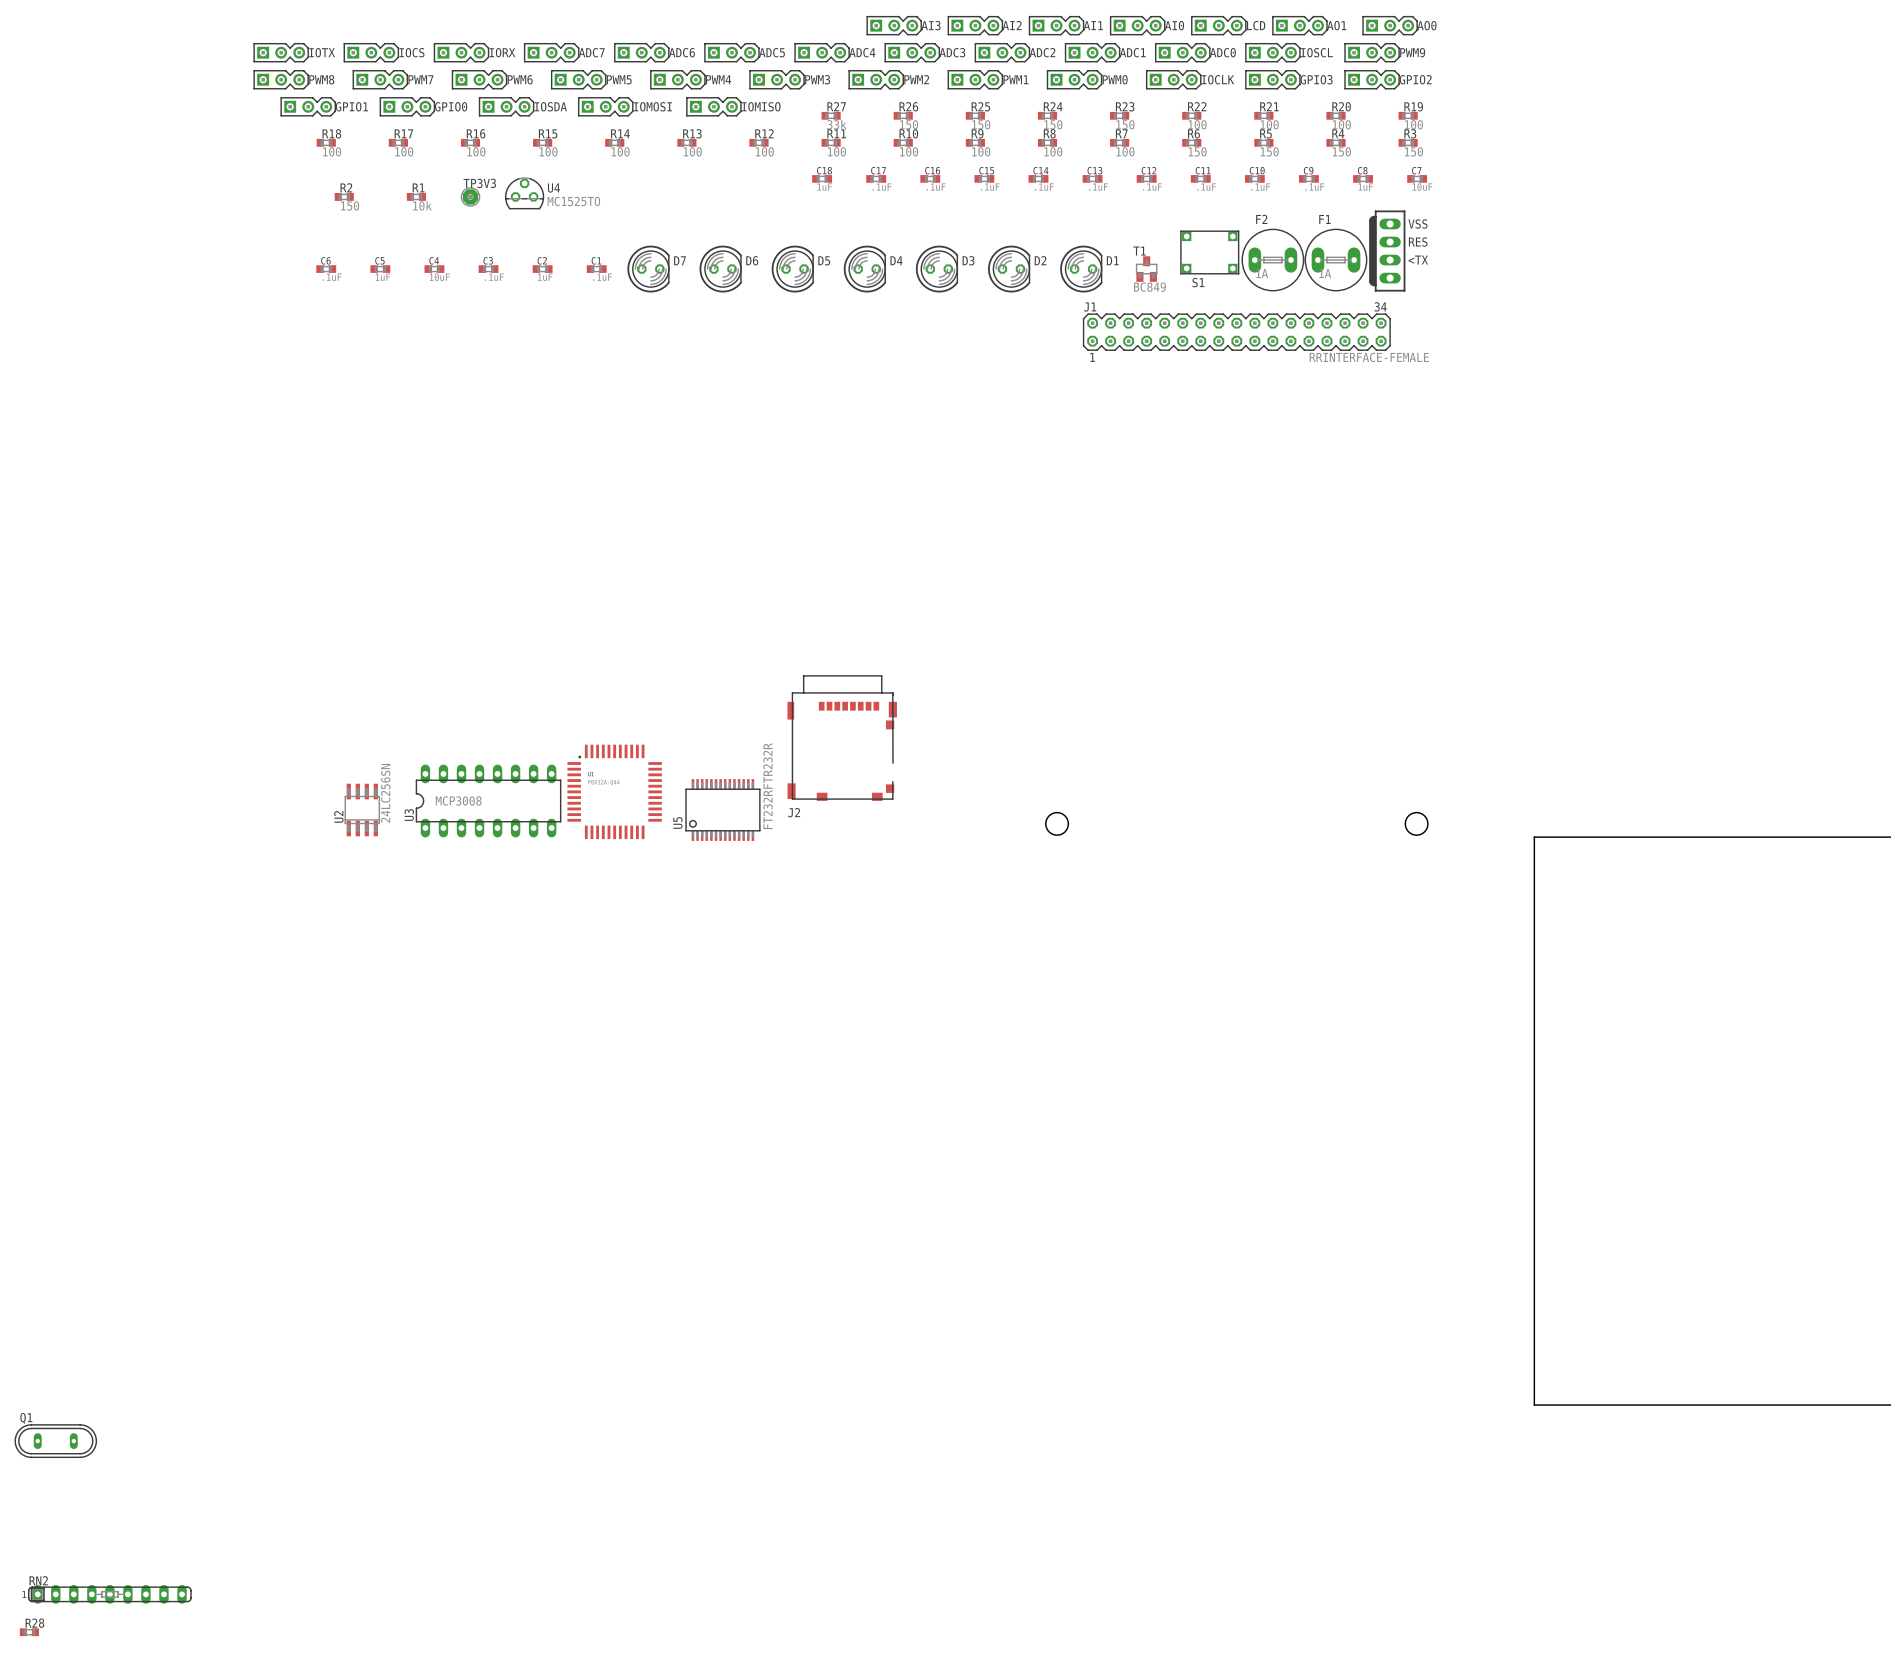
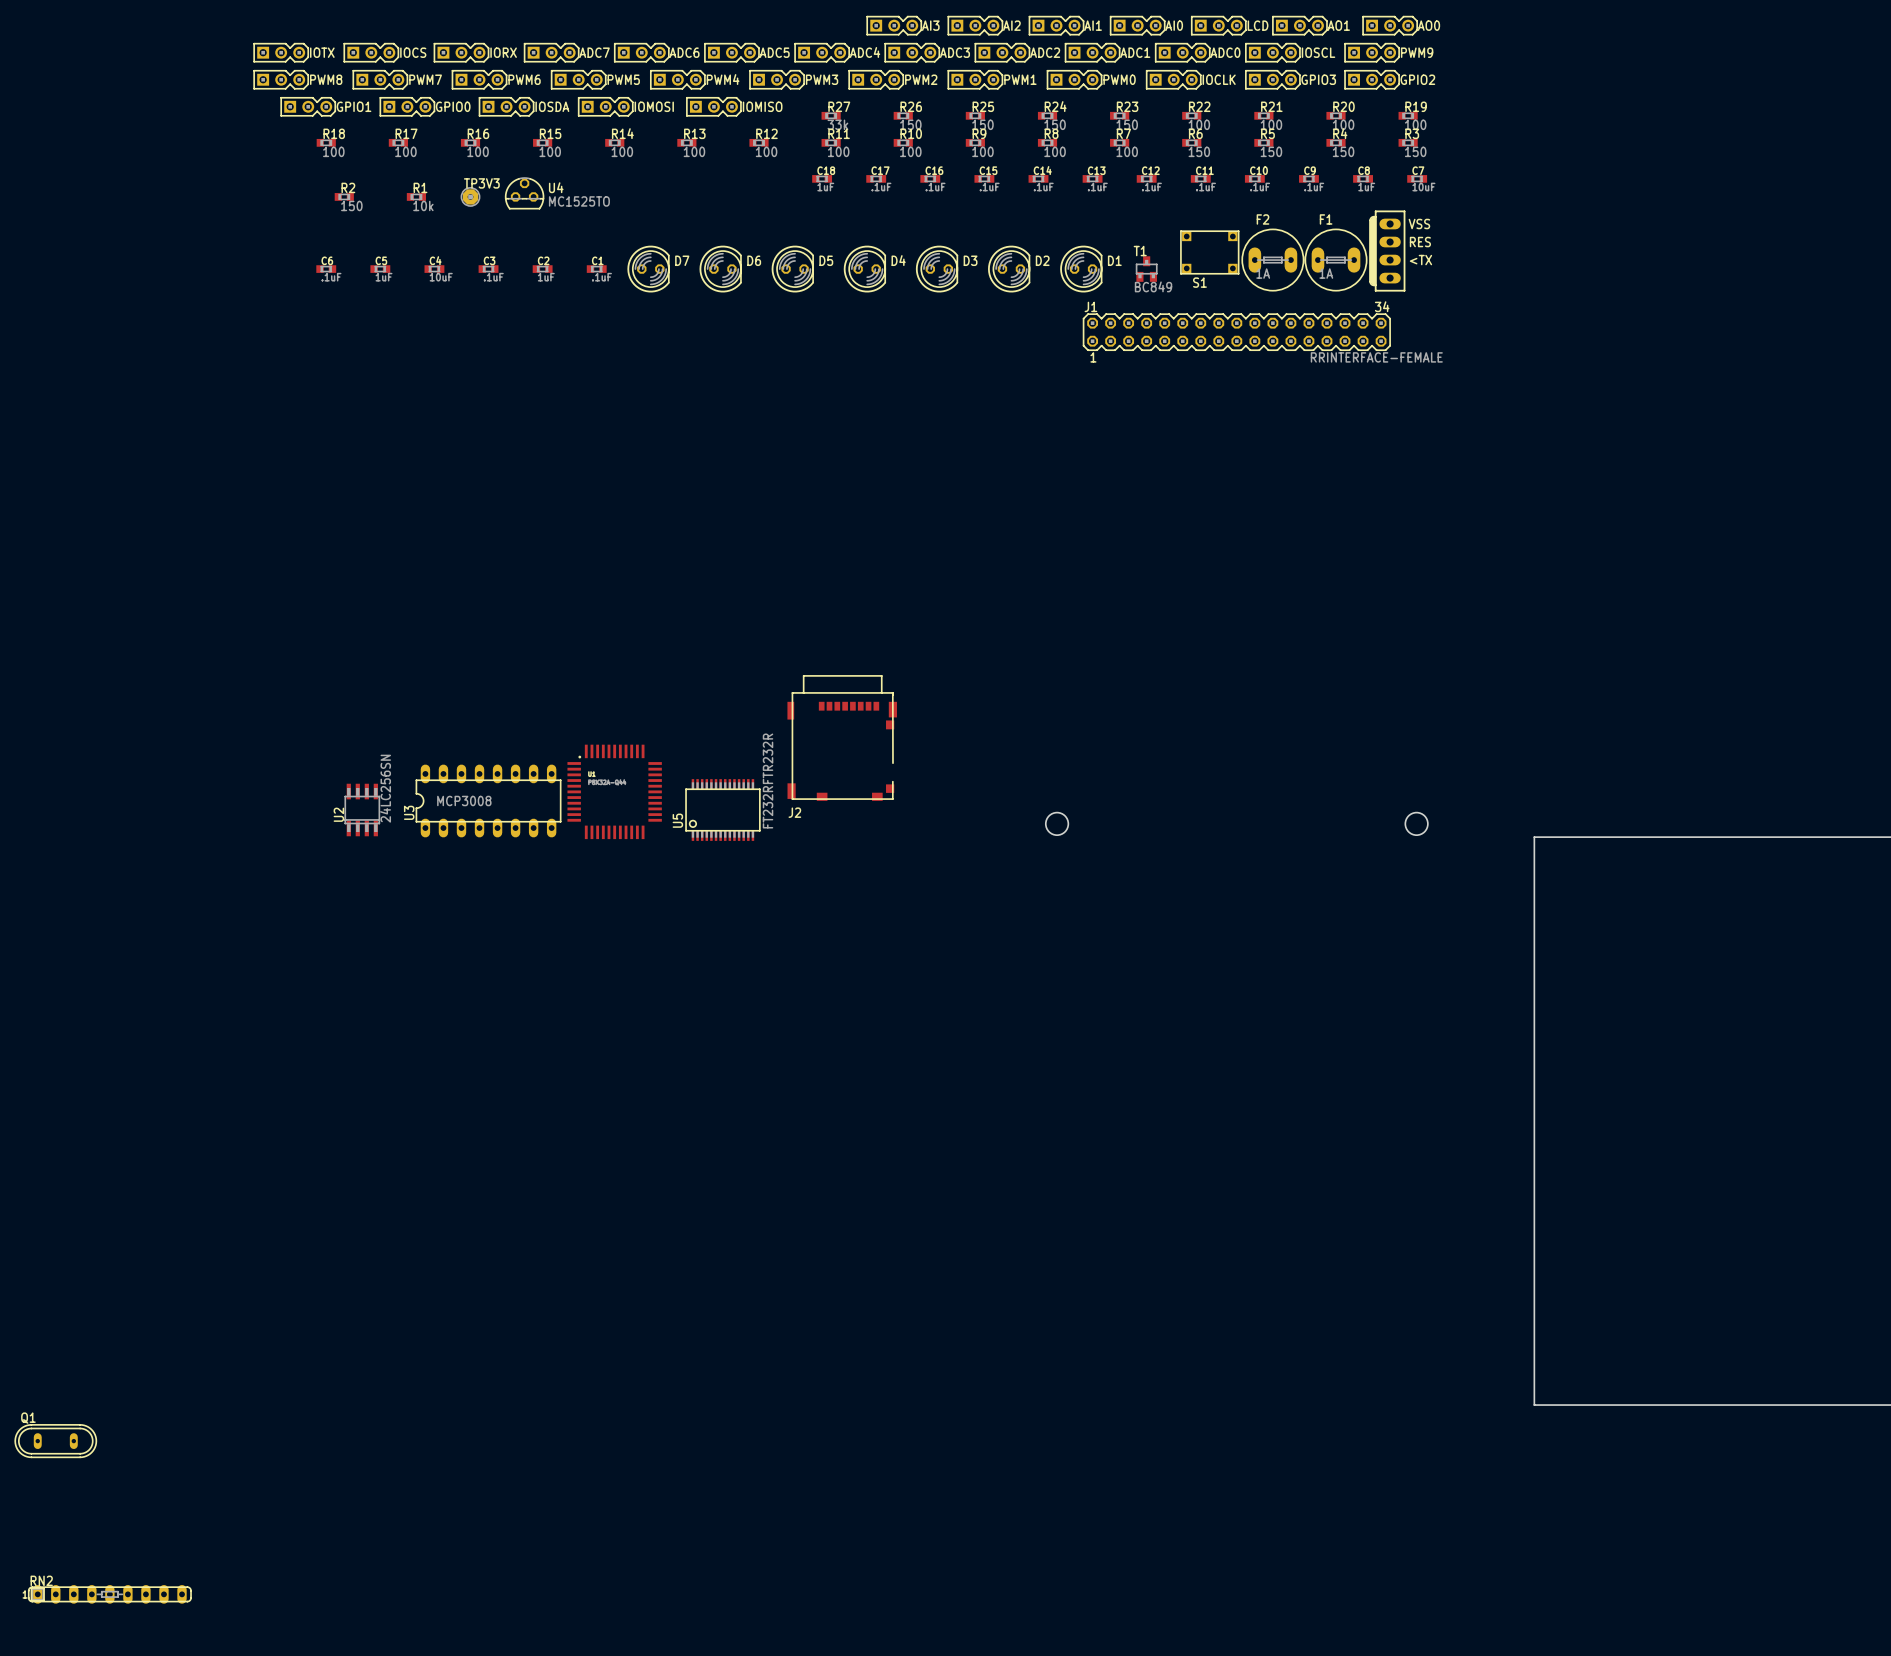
R28: (29, 1632) -> none

